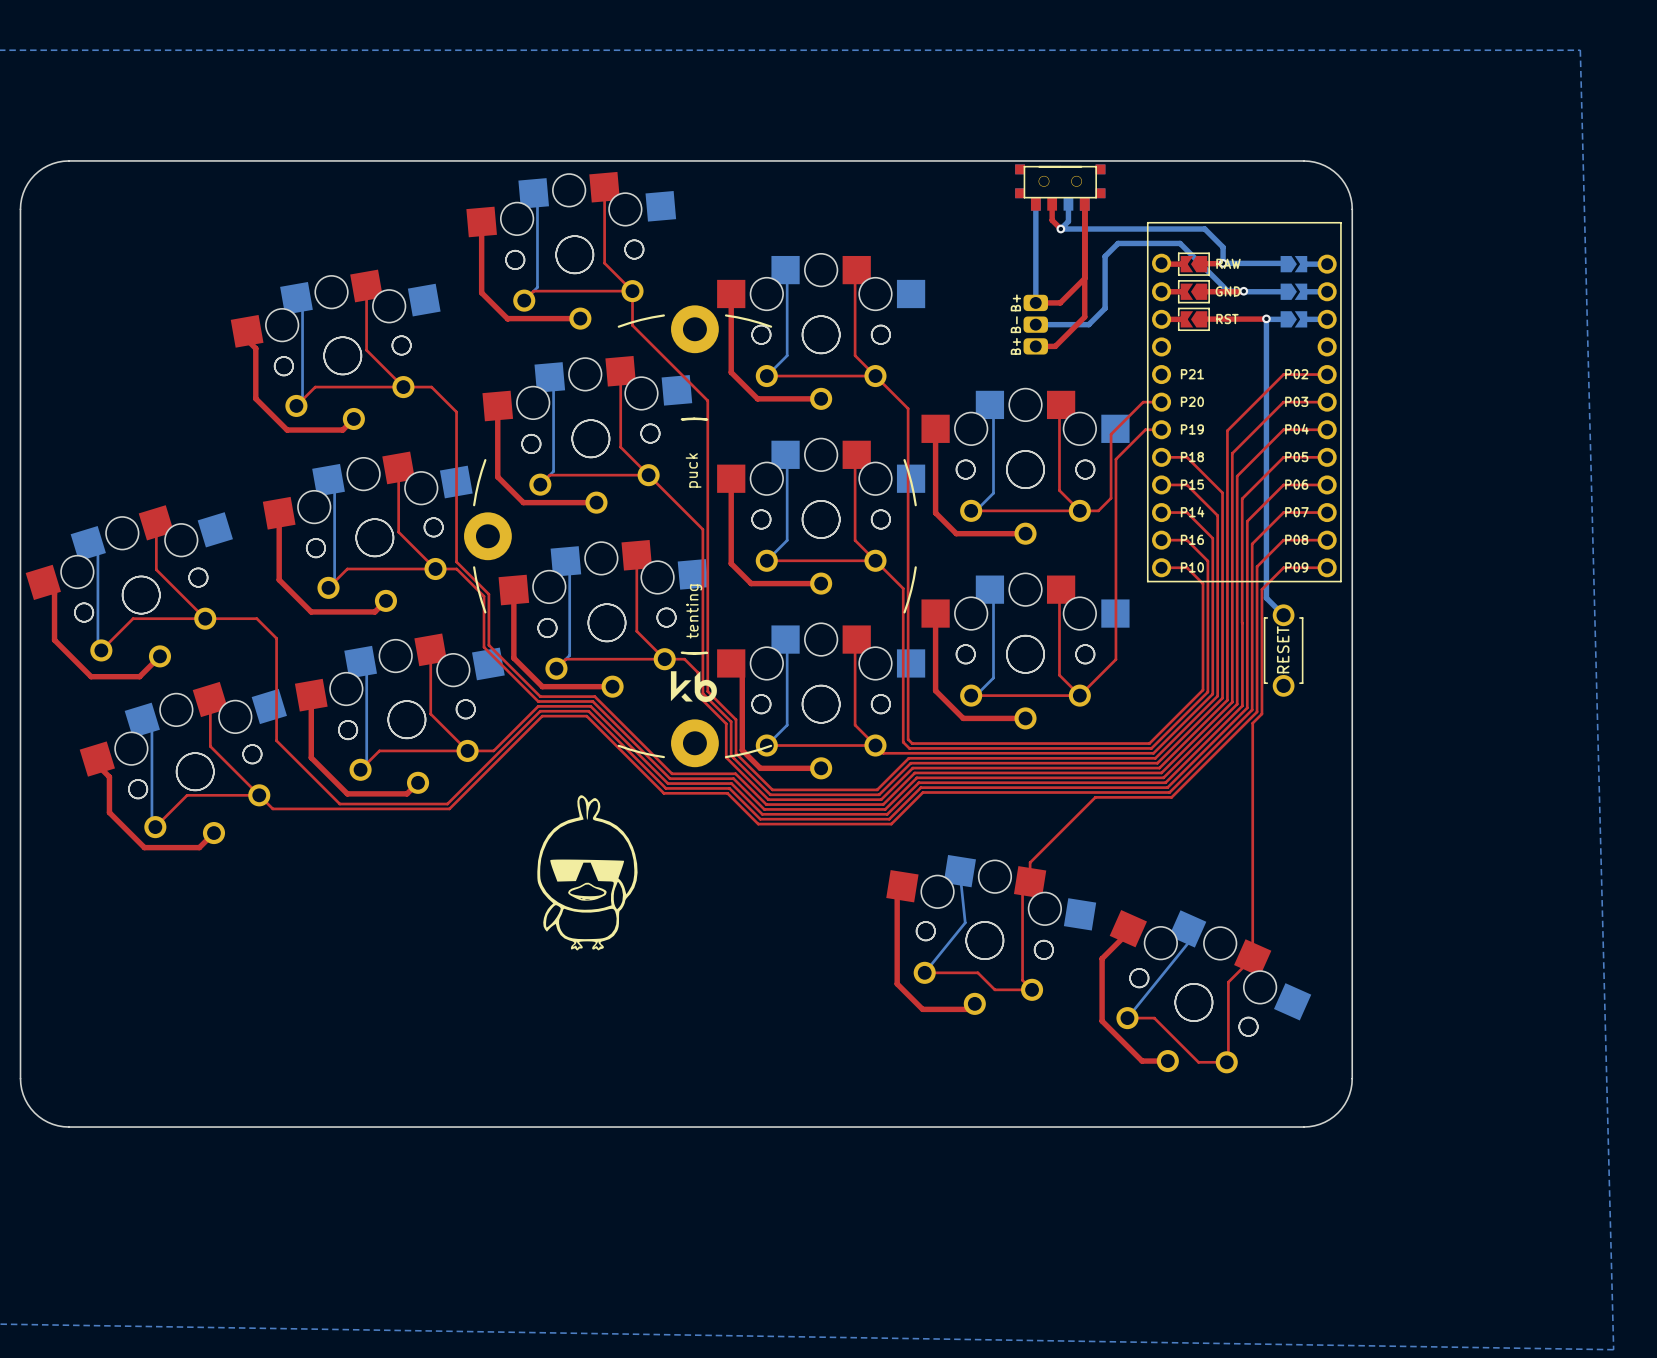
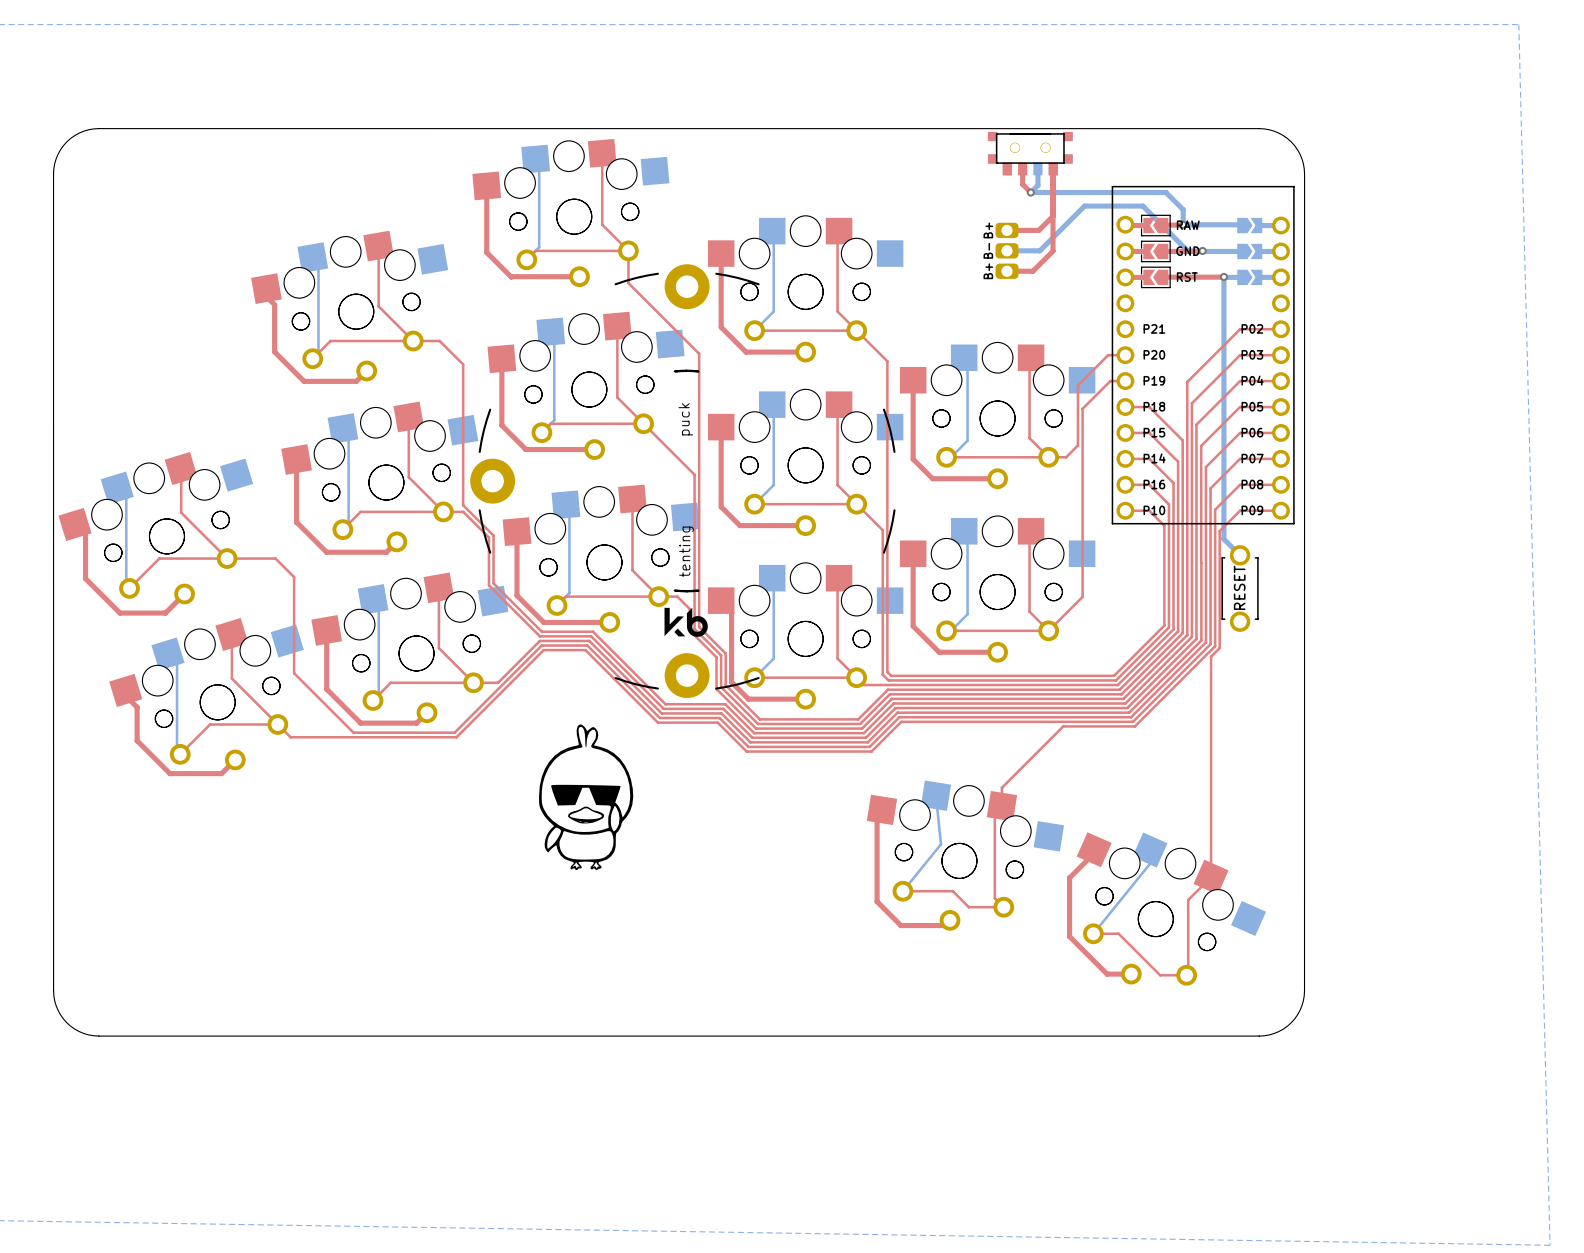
bottom track: (1035, 203) (1035, 302) -> none
top track: (1084, 203) (1084, 316) (1055, 346) (1035, 346) -> none
top track: none -> (1053, 169) (1053, 251) (1032, 271) (1007, 271)
top track: none -> (1053, 216) (1038, 230) (1007, 230)
bottom track: (1105, 256) (1105, 308) (1088, 324) (1035, 324) -> (1072, 218) (1039, 250) (1007, 250)
top track: (1084, 278) (1060, 302) (1035, 302) -> none
part position: (1035, 324) -> (1007, 250)

